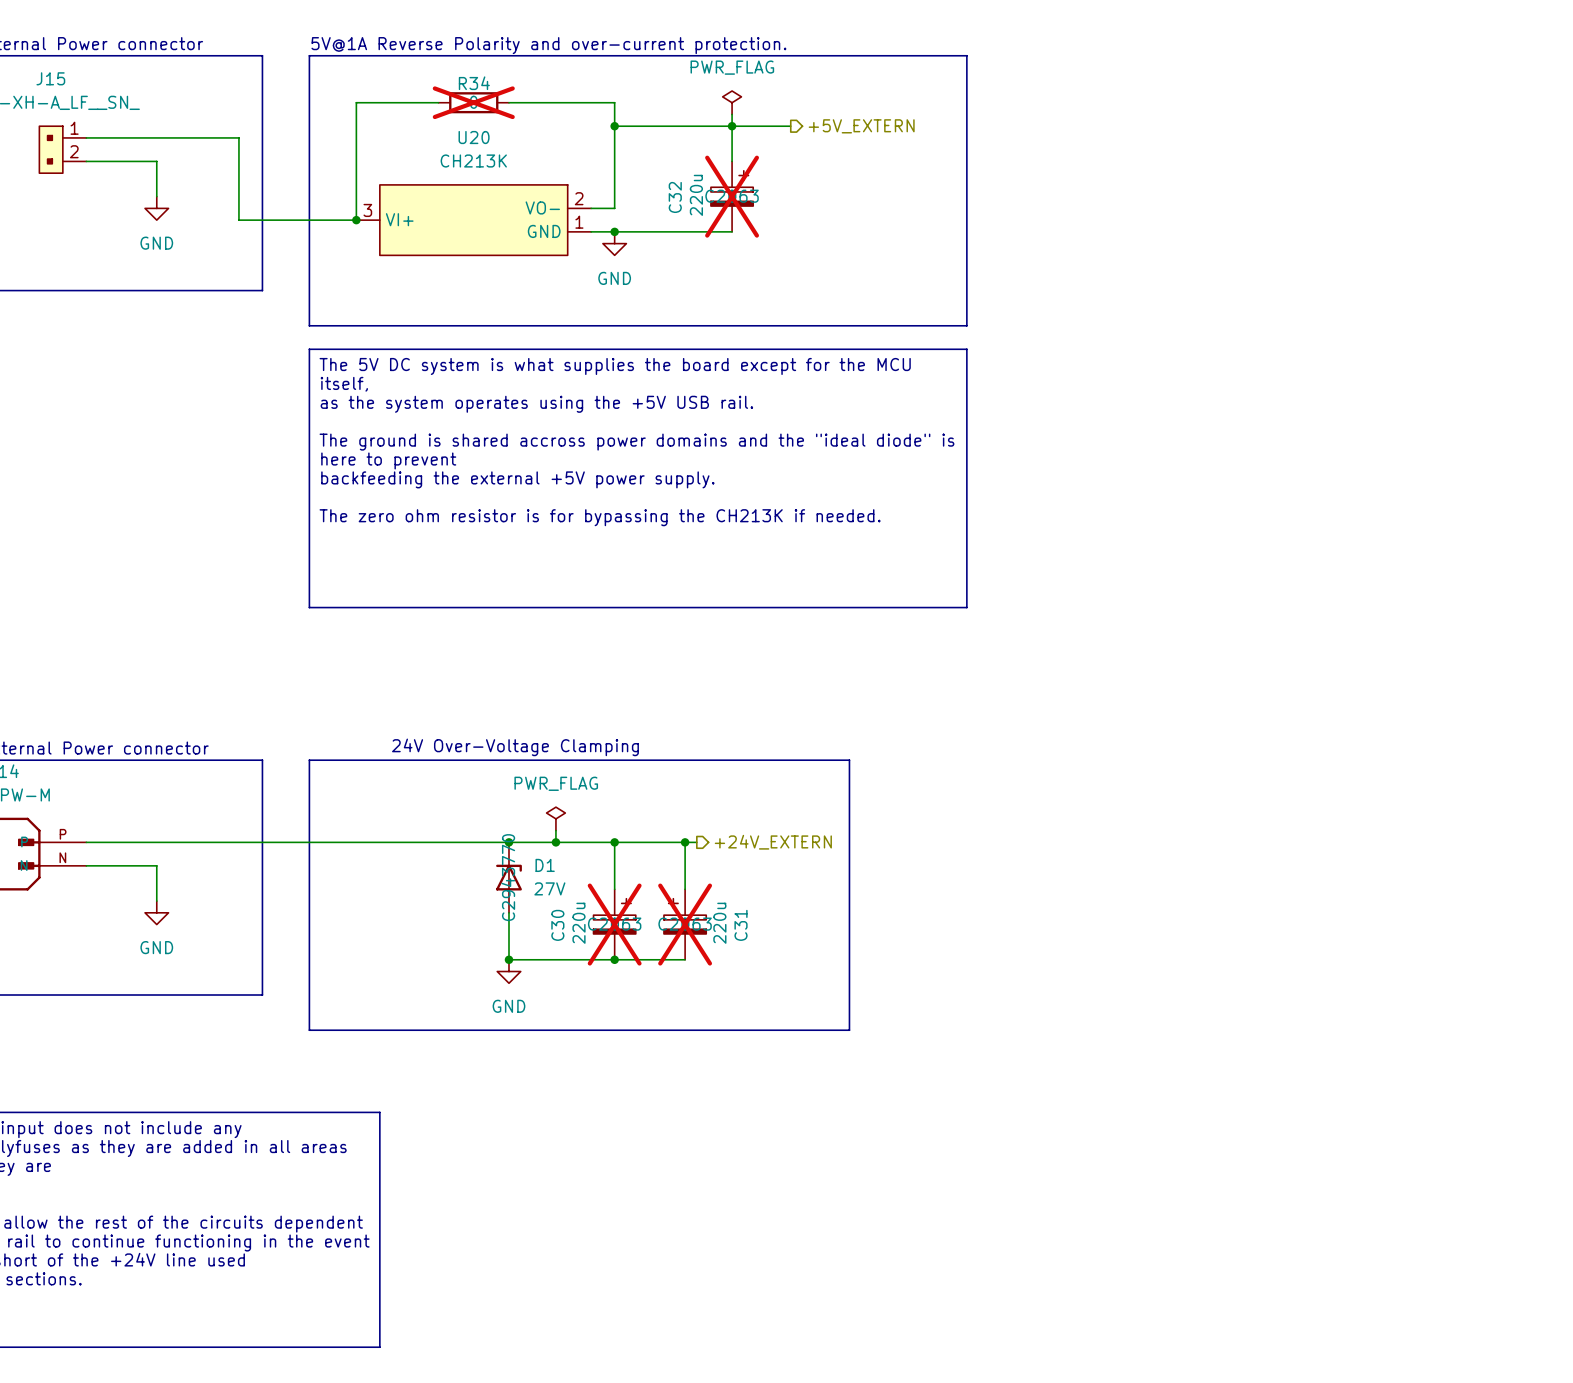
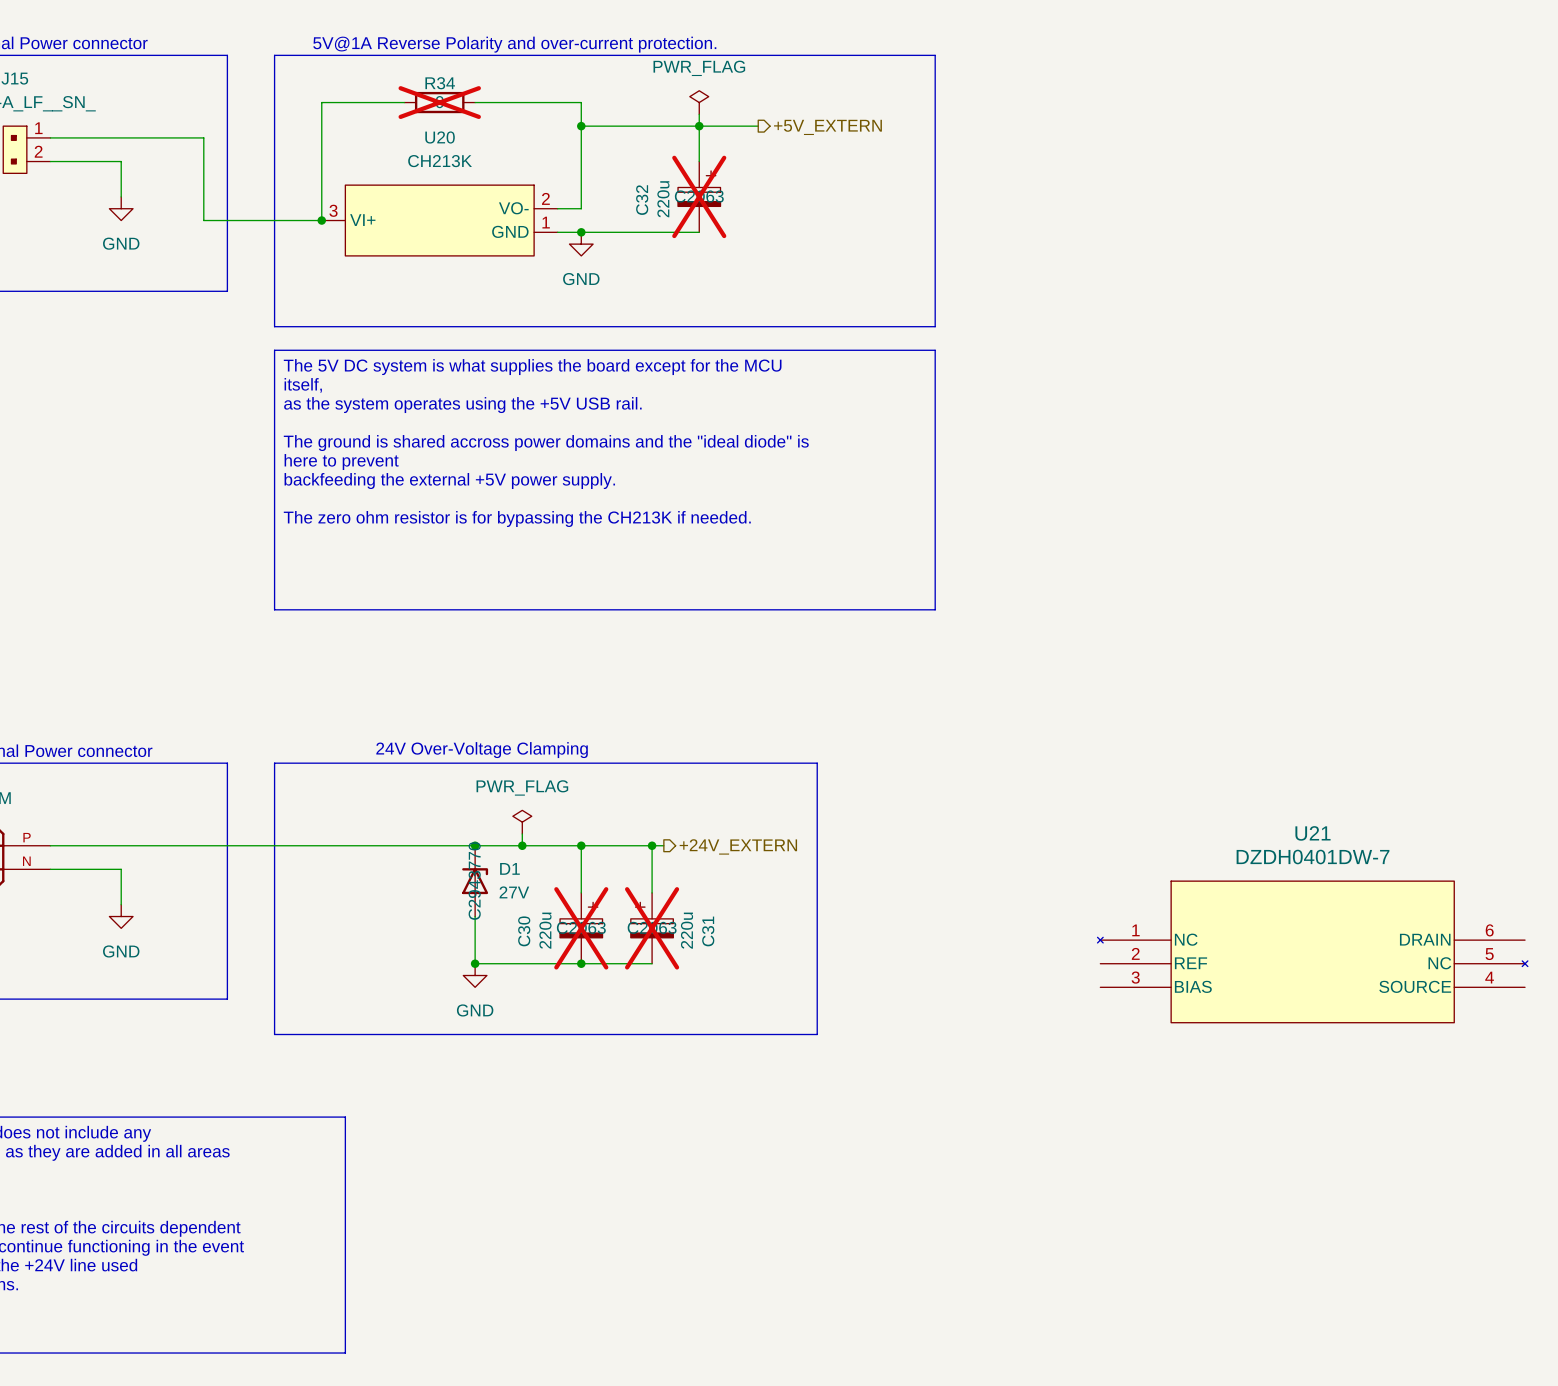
U21: none -> DZDH0401DW-7 (1312, 951)

